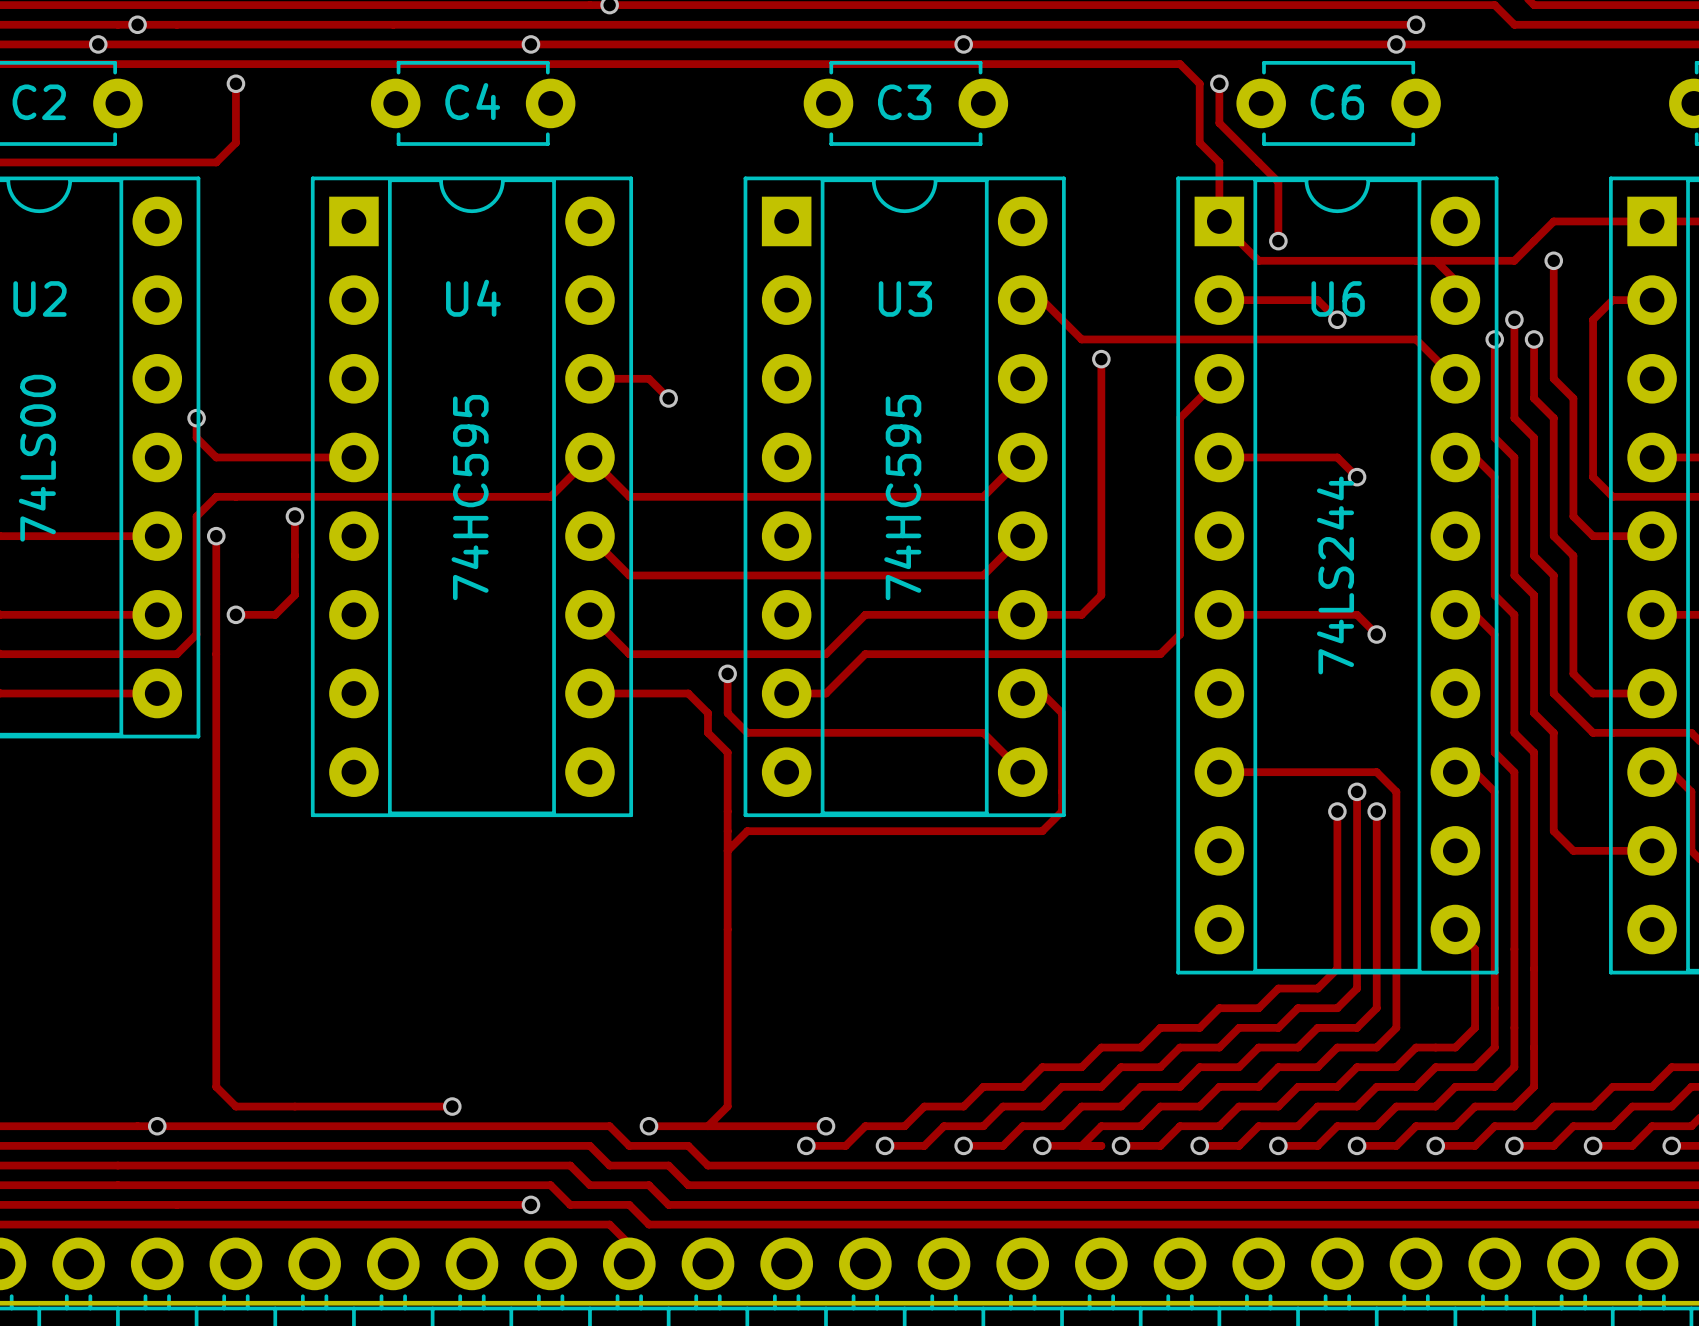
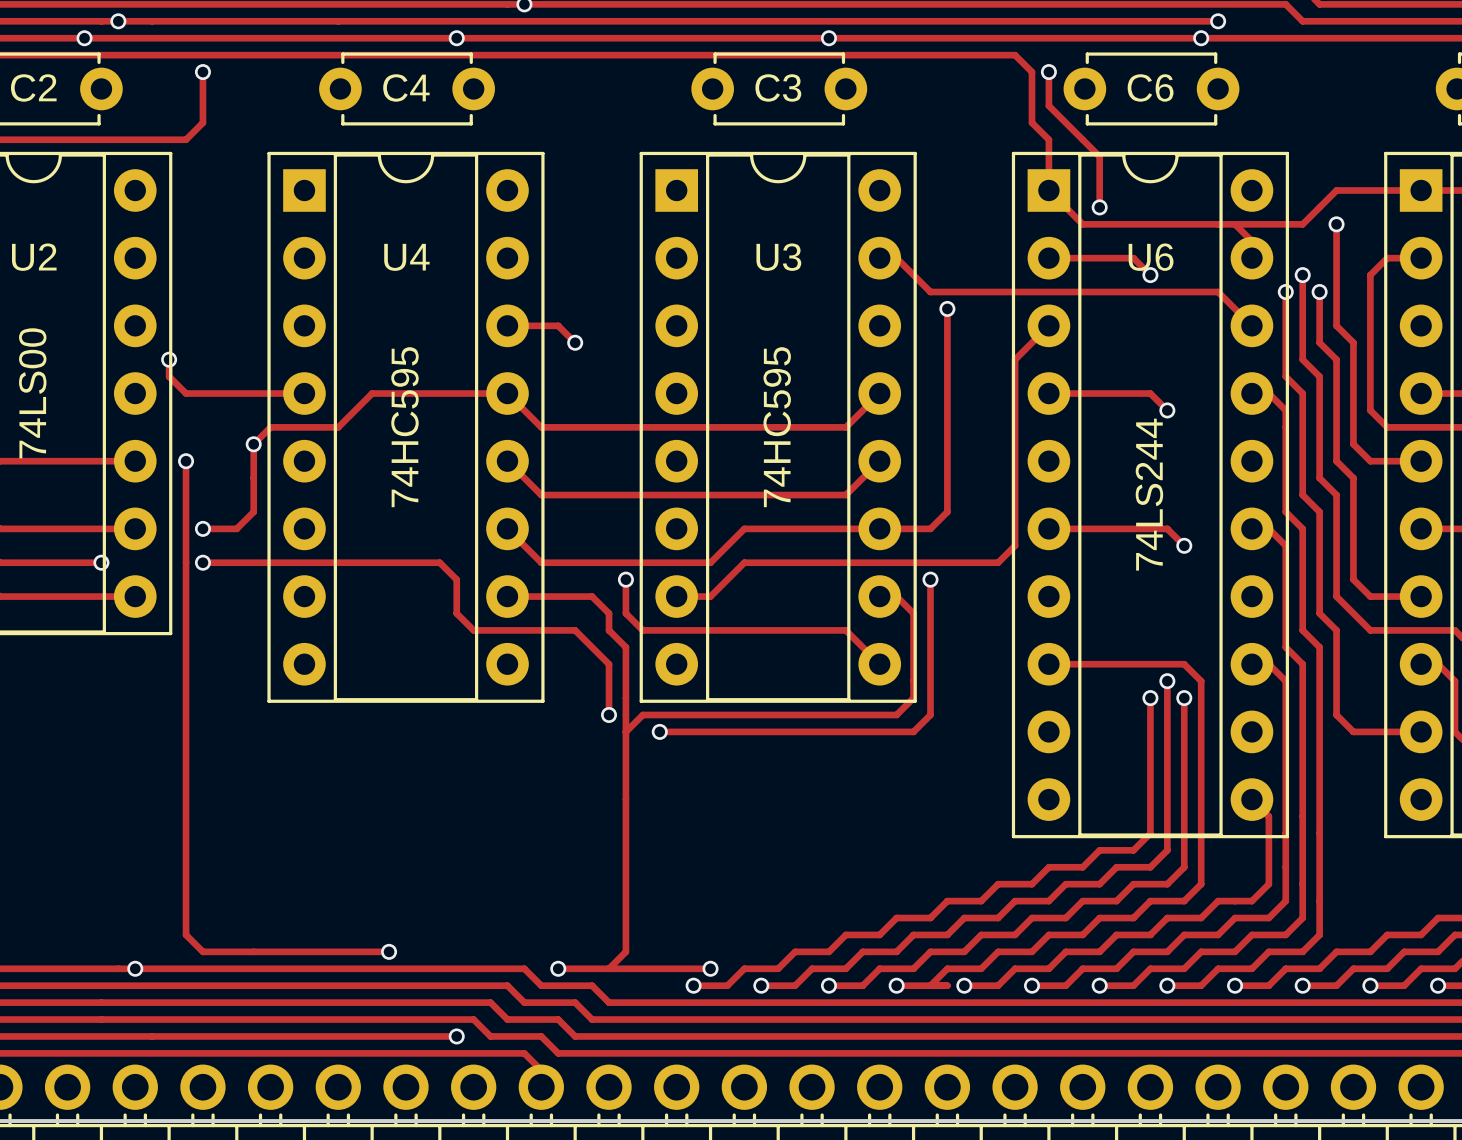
track: (589, 457) (550, 496) (393, 496) -> (507, 393) (372, 393) (338, 427)
track: (314, 496) (216, 496) (196, 516) (196, 634) (176, 654) (117, 654) -> (270, 427) (253, 444)
via: none -> (101, 562)
track: none -> (202, 562) (439, 562) (456, 579) (456, 613) (473, 630) (575, 630) (609, 664) (609, 714)
via: none -> (202, 562)
track: none -> (930, 579) (930, 714) (913, 731) (659, 731)
via: none -> (930, 579)
via: none -> (609, 714)
via: none -> (659, 731)

